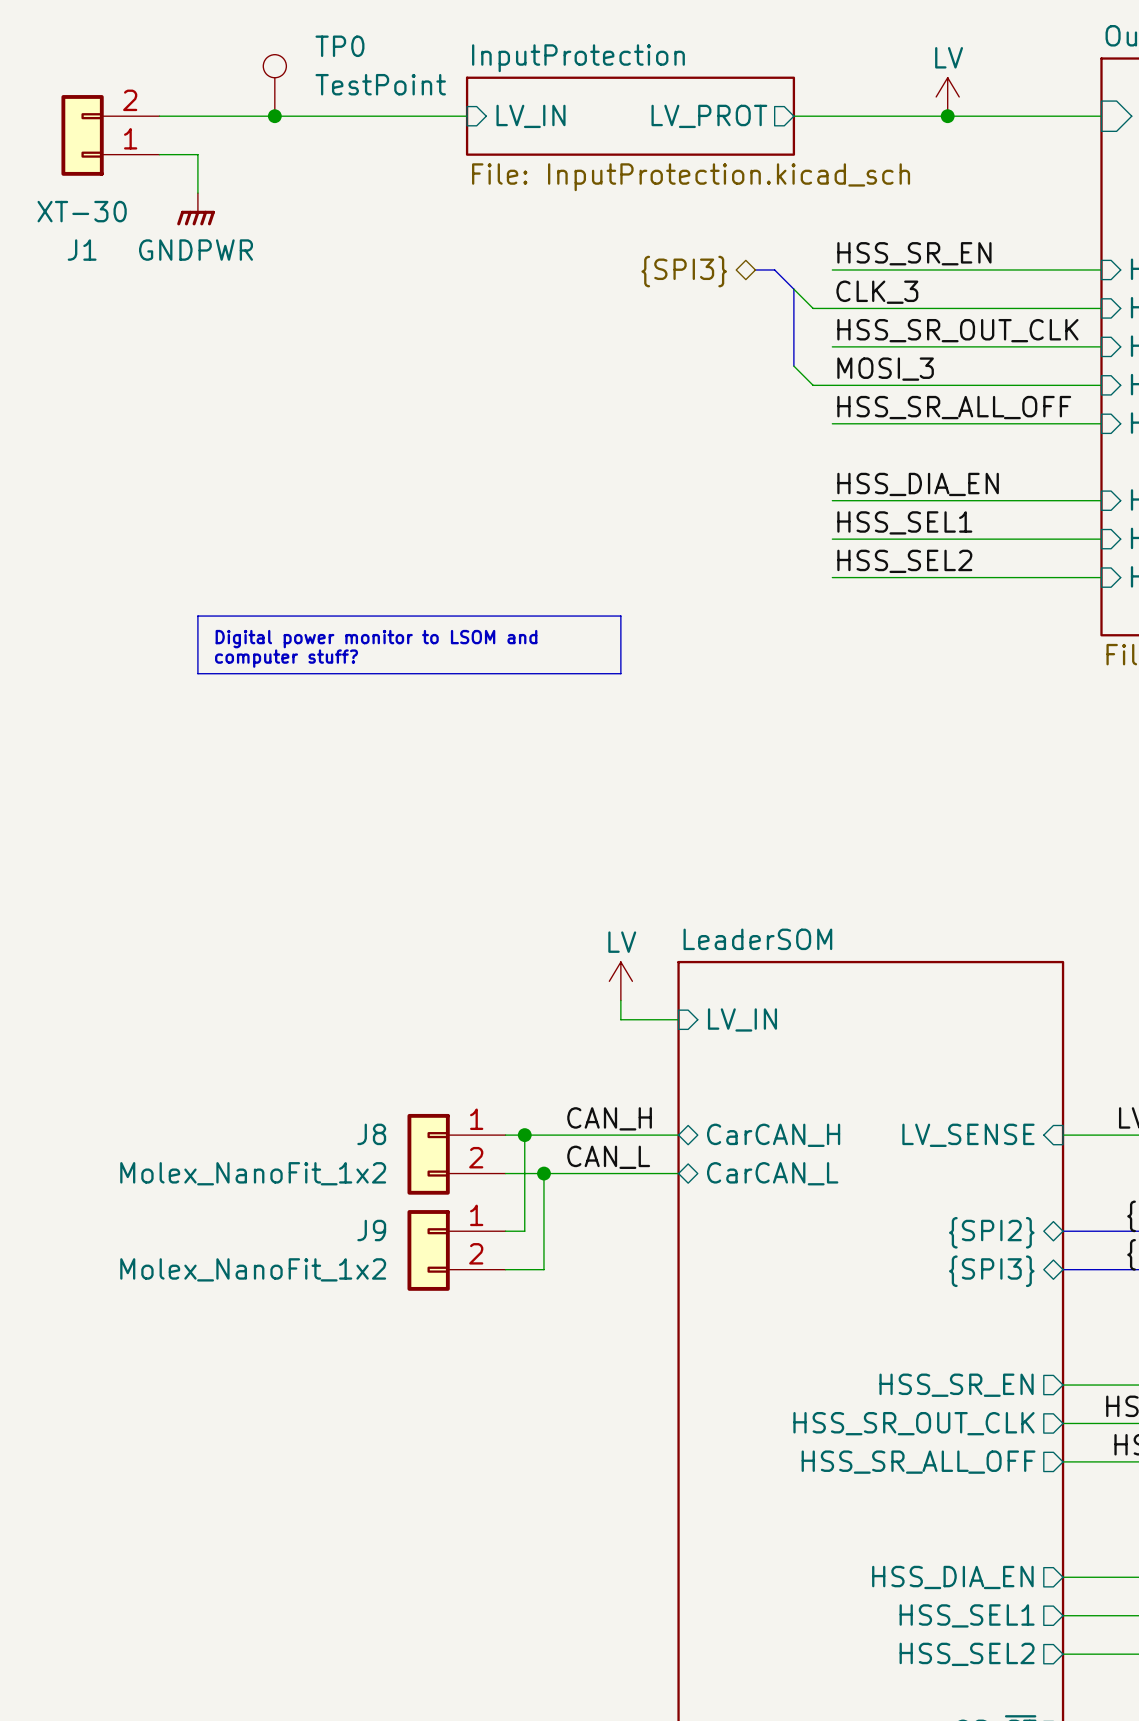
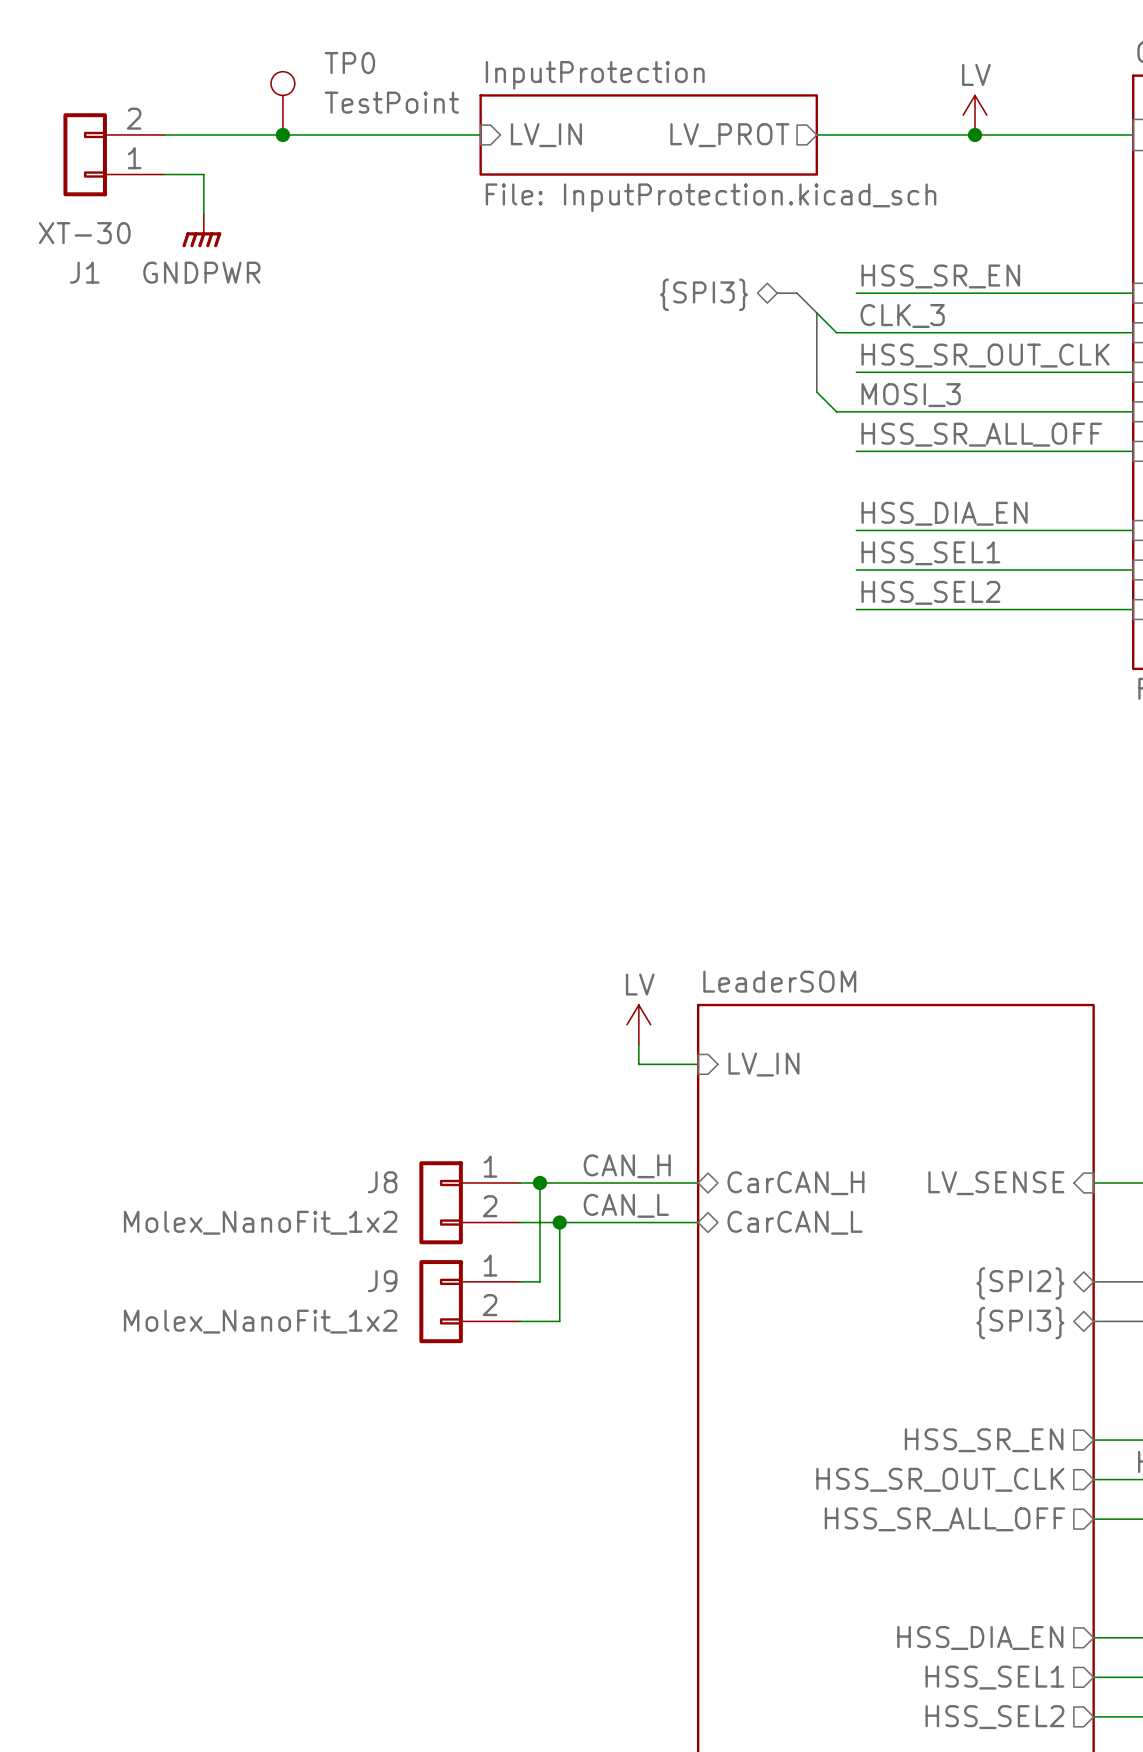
line: (197, 616) (620, 616) (620, 673) (197, 673) (197, 616) -> none
text: Digital power monitor to LSOM and (376, 639) -> none
text: computer stuff? (286, 658) -> none

